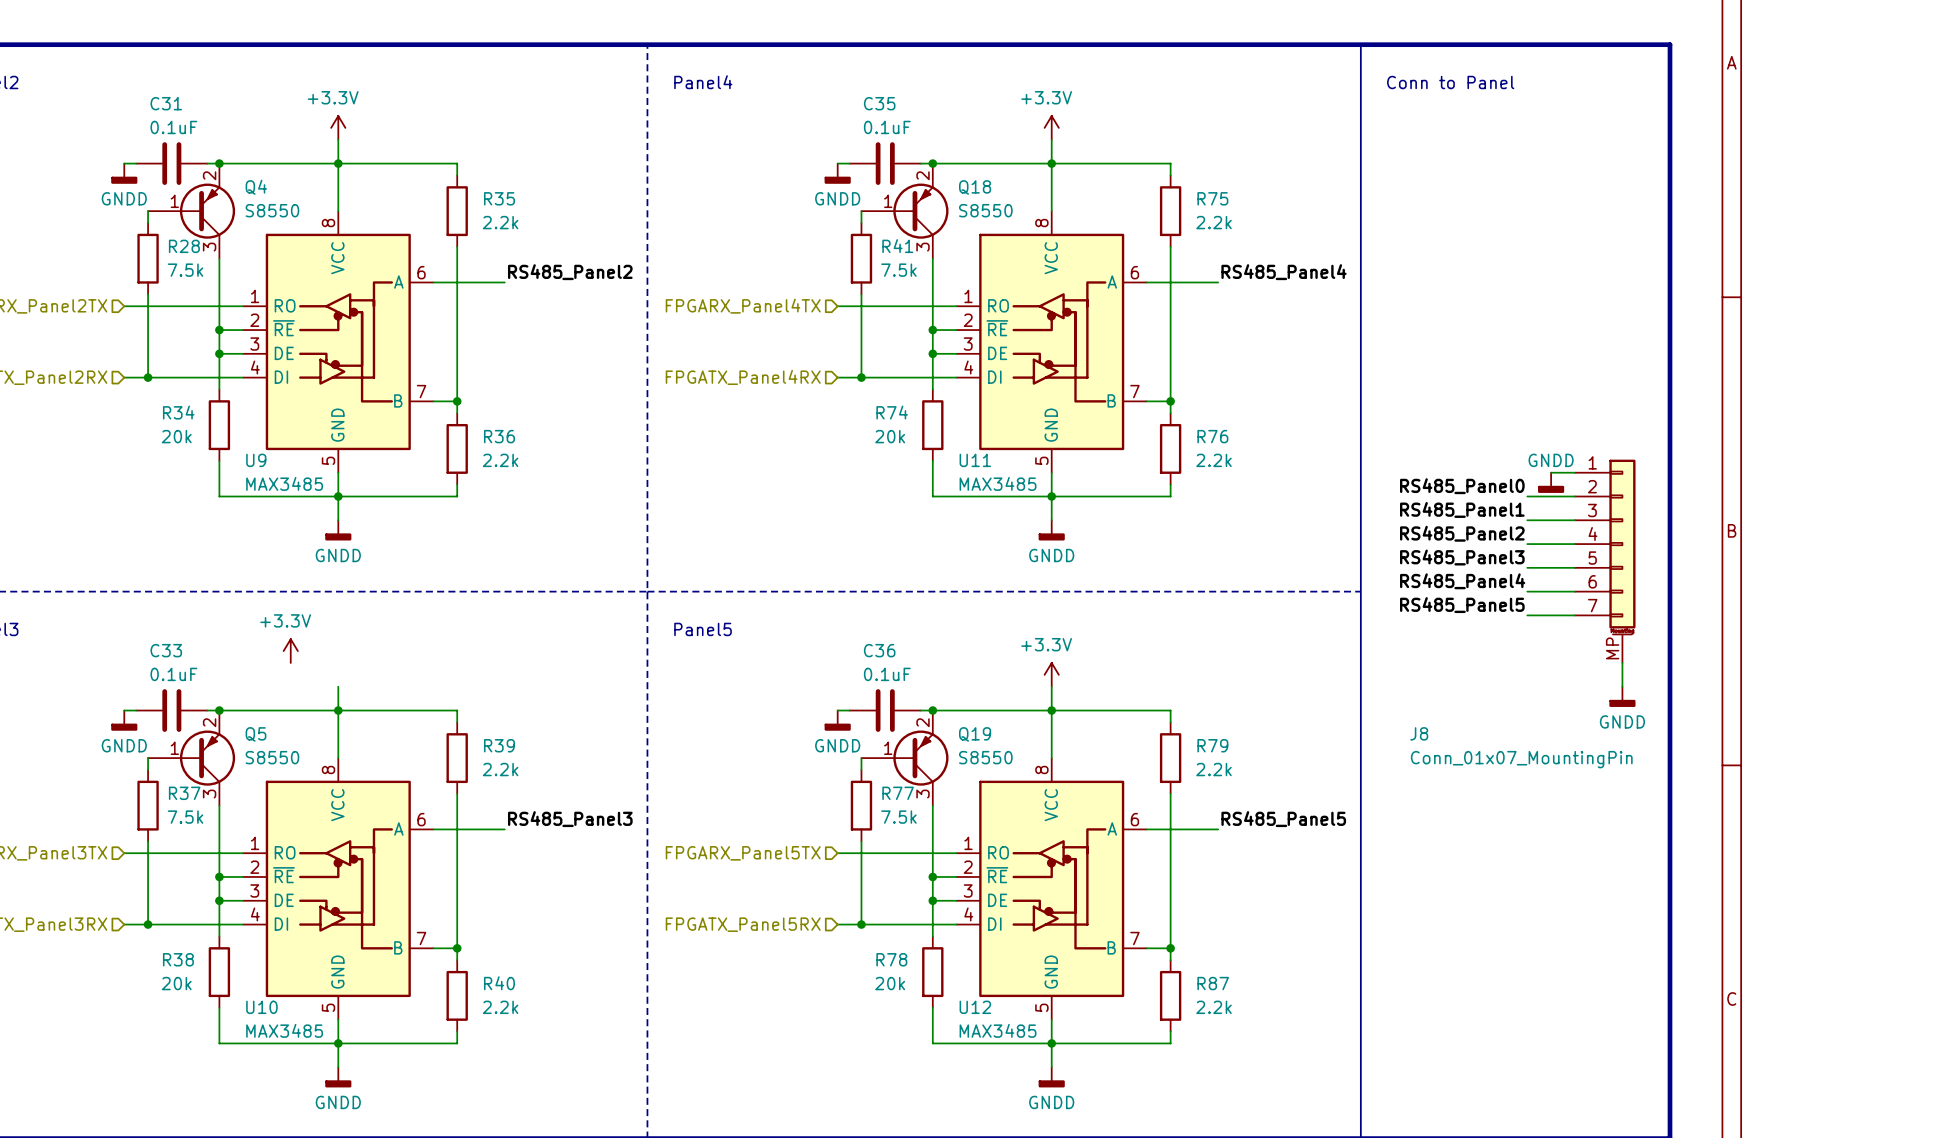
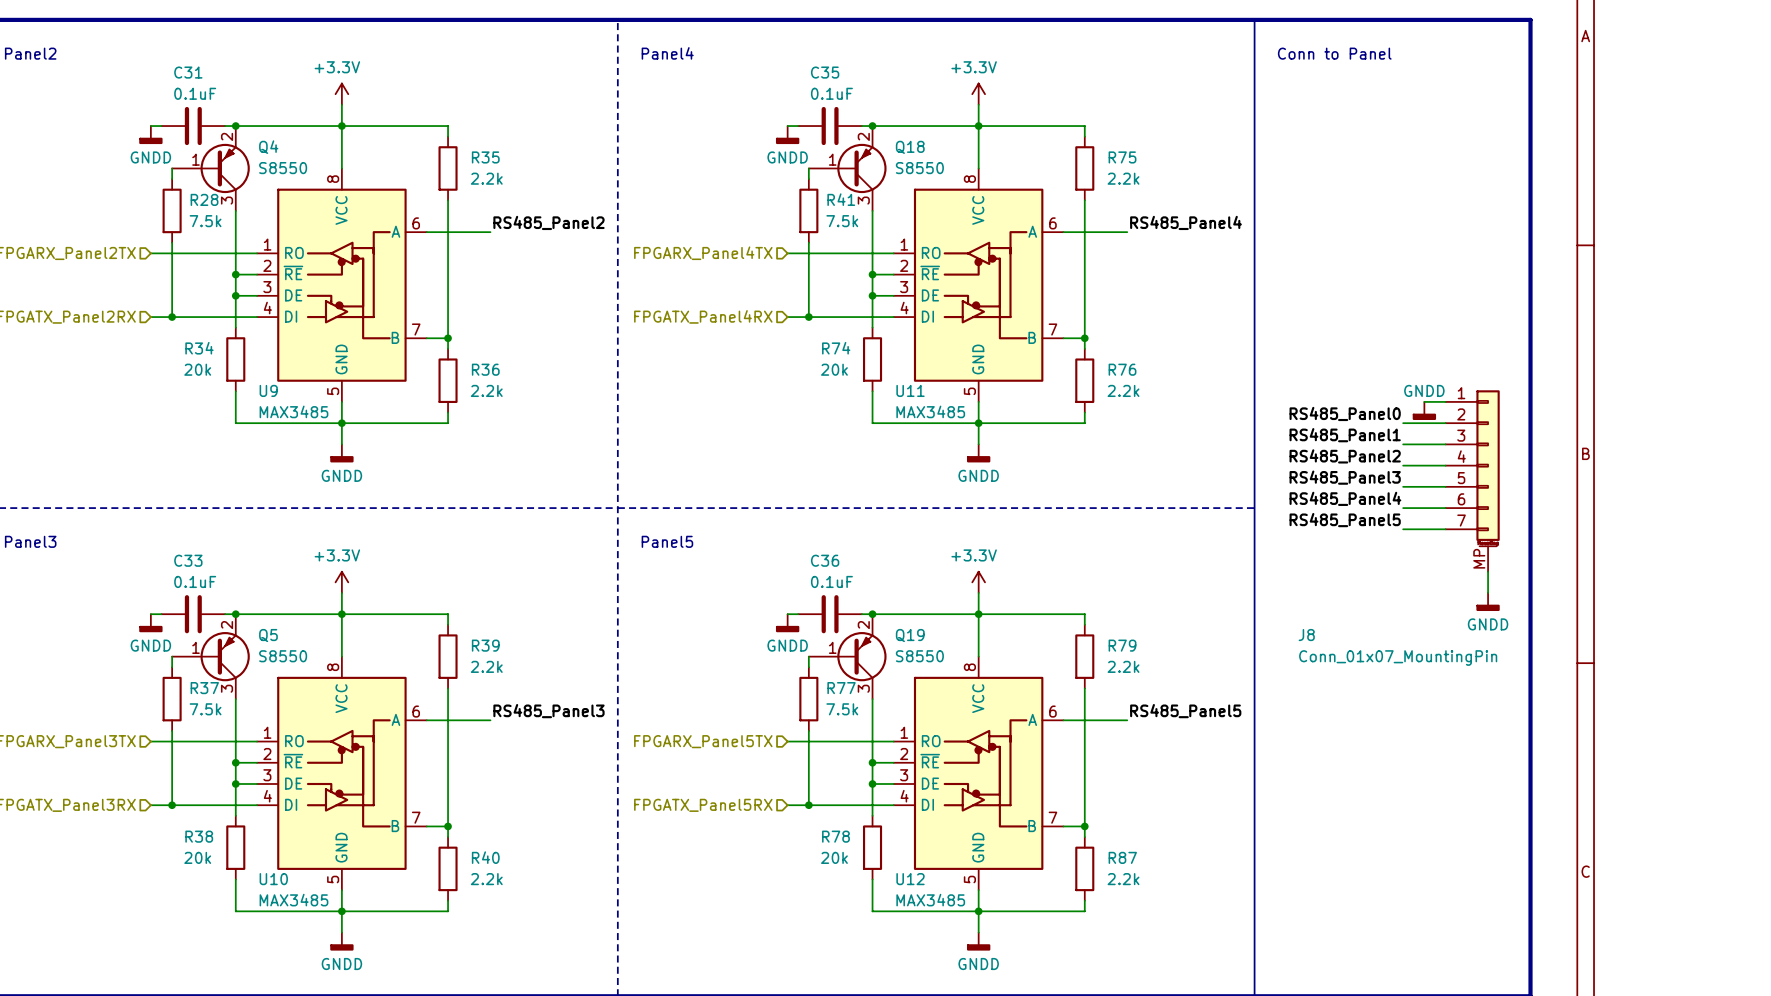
power symbol position: +3.3V (290, 651) -> +3.3V (341, 582)

